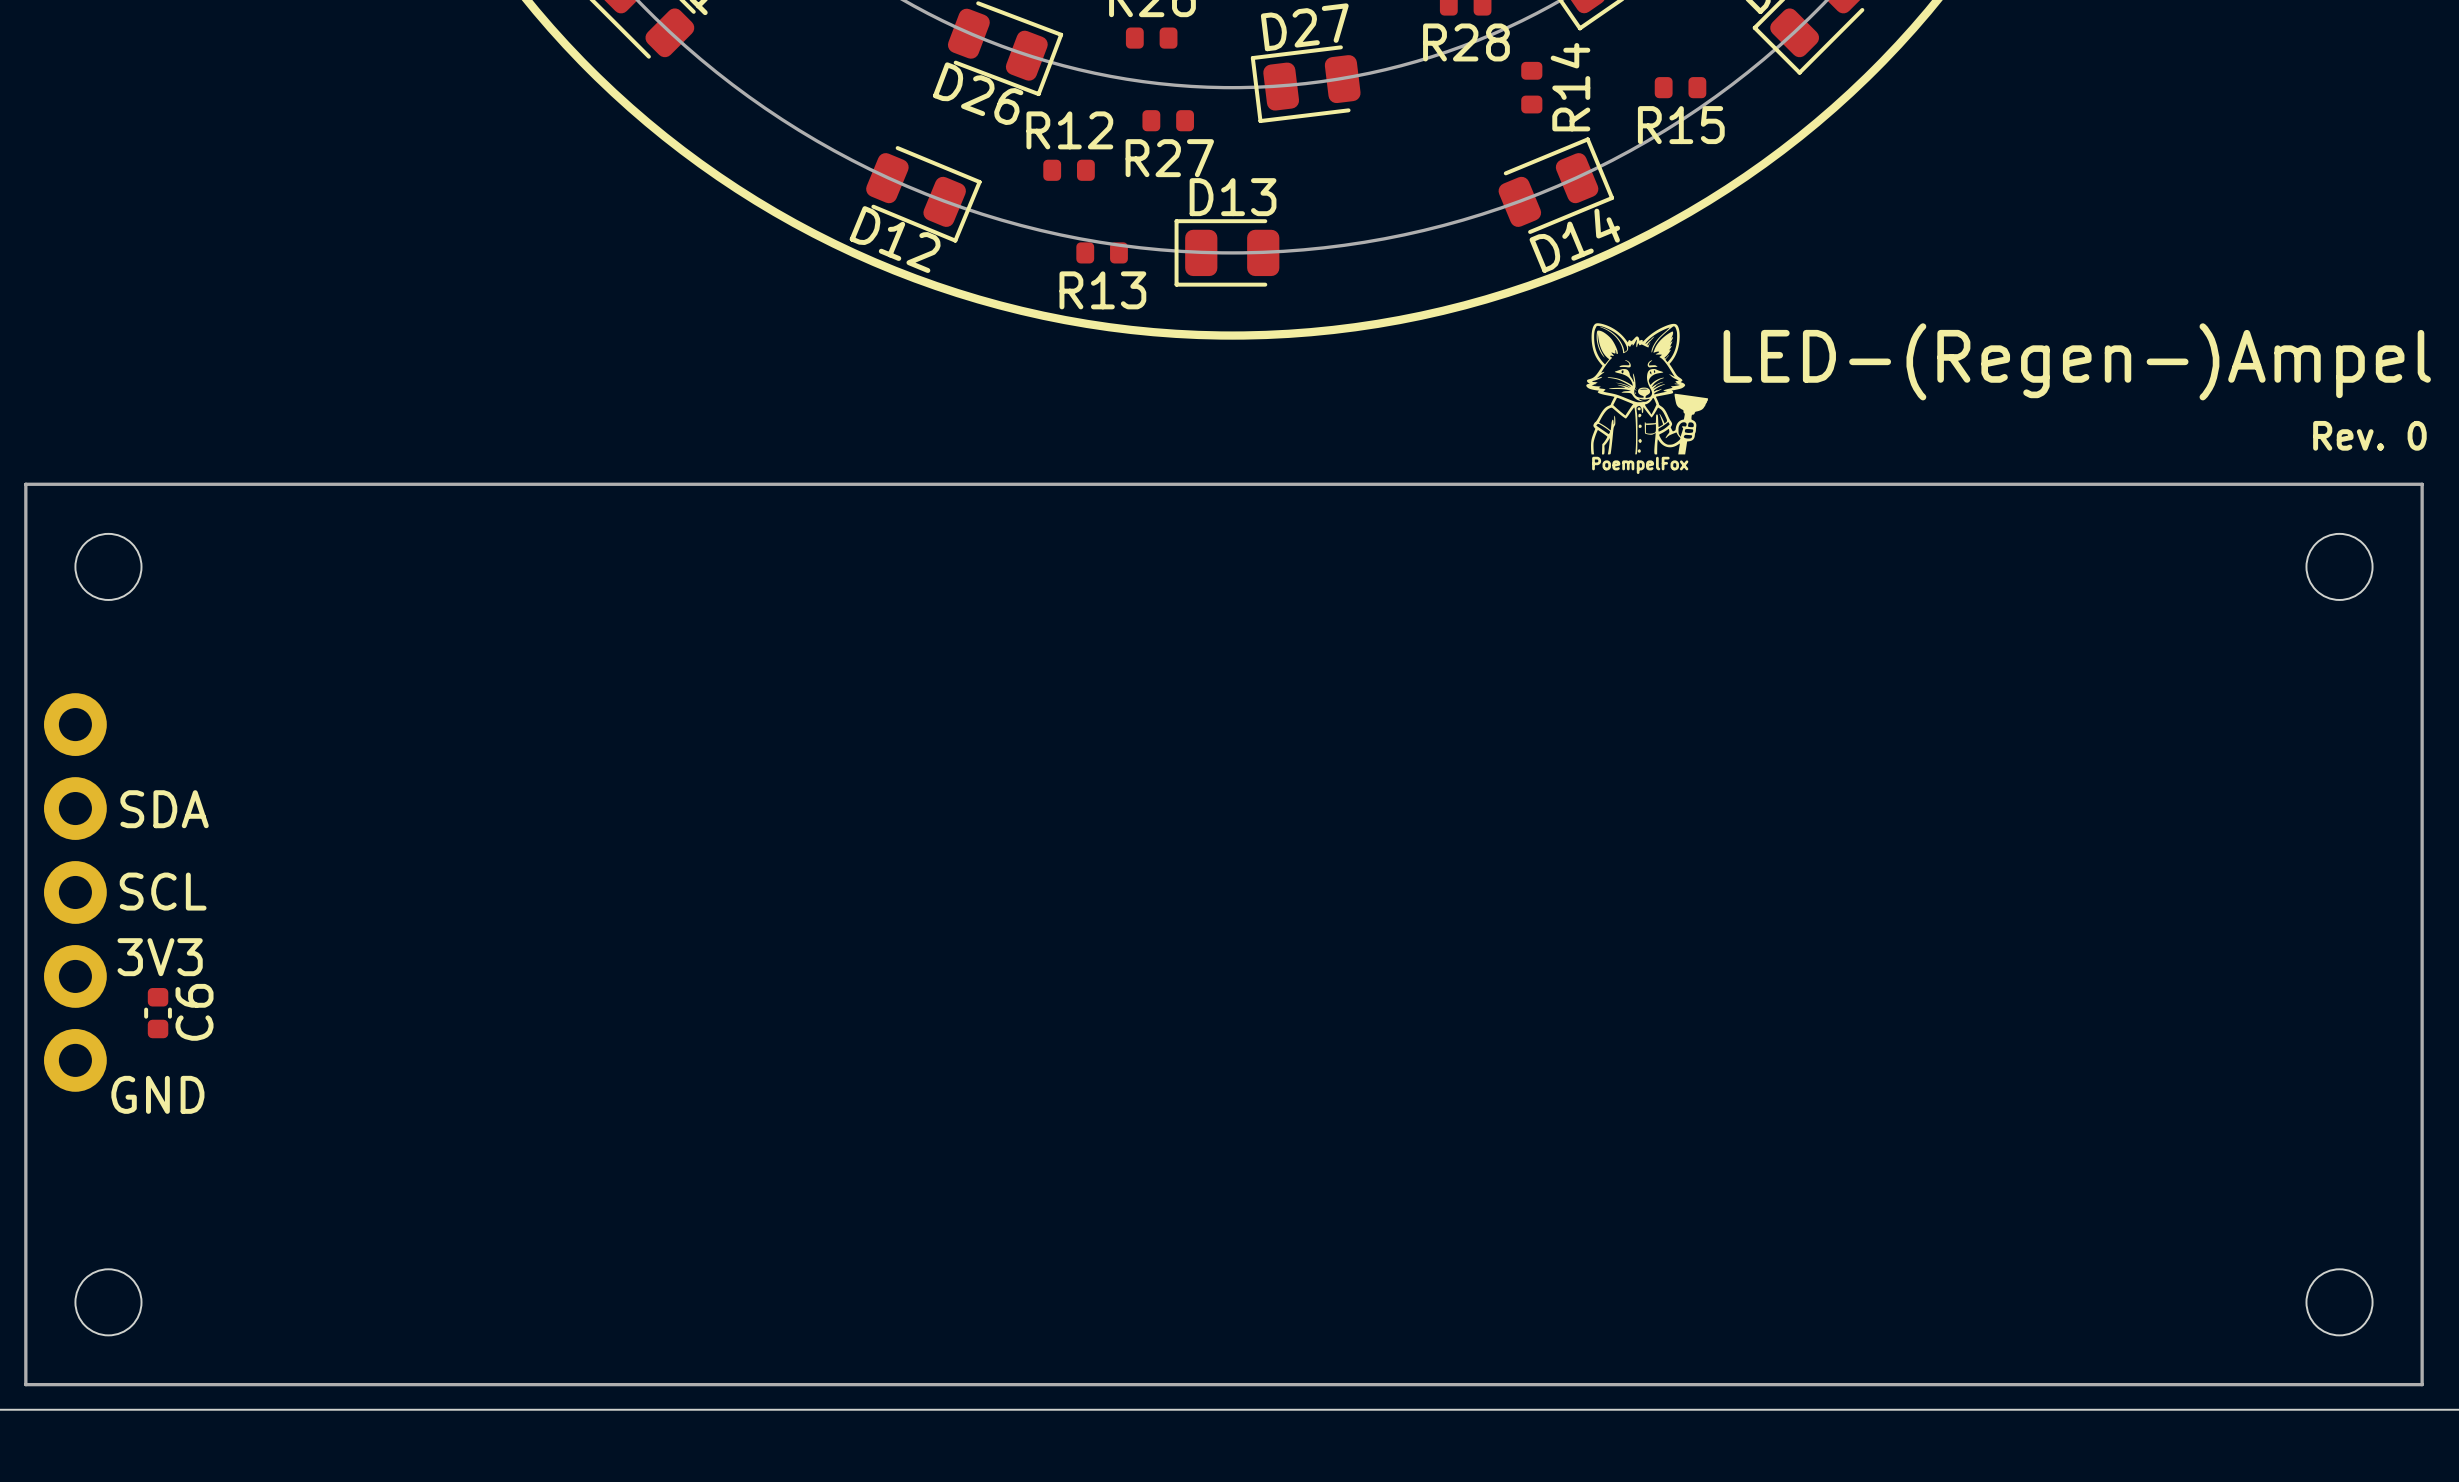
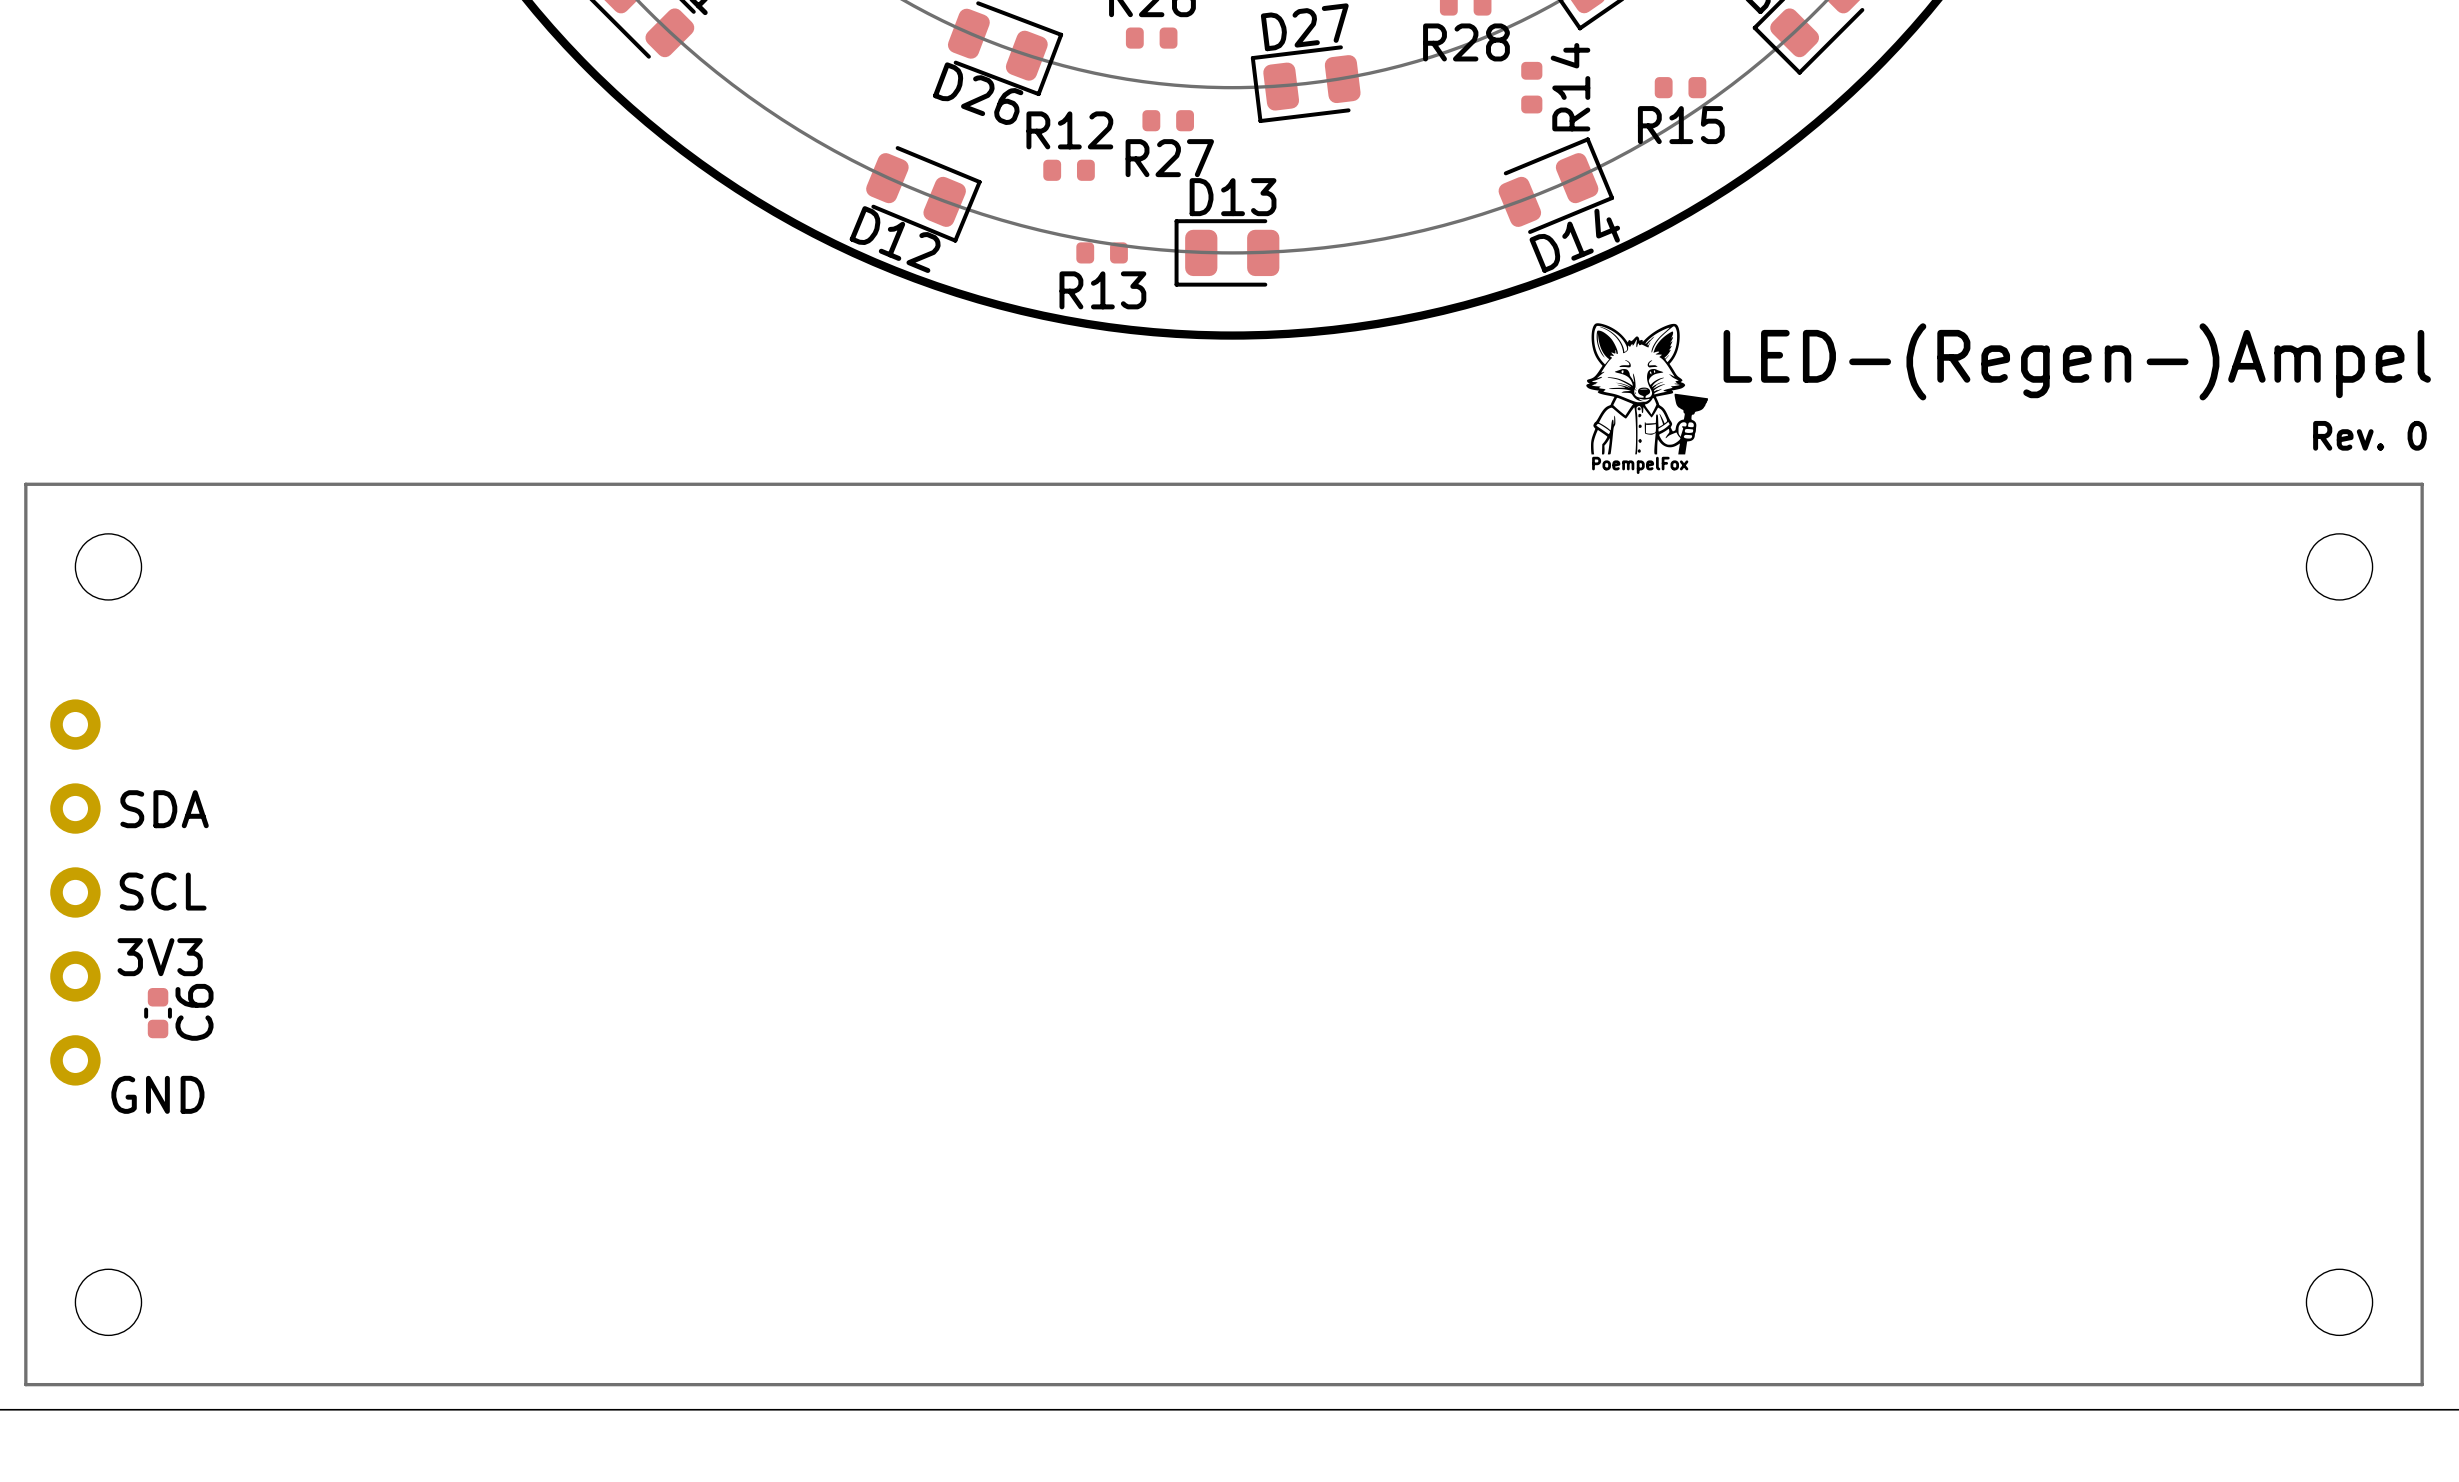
part footprint: [24, 482, 2424, 1387] -> [24, 482, 2424, 1387]

